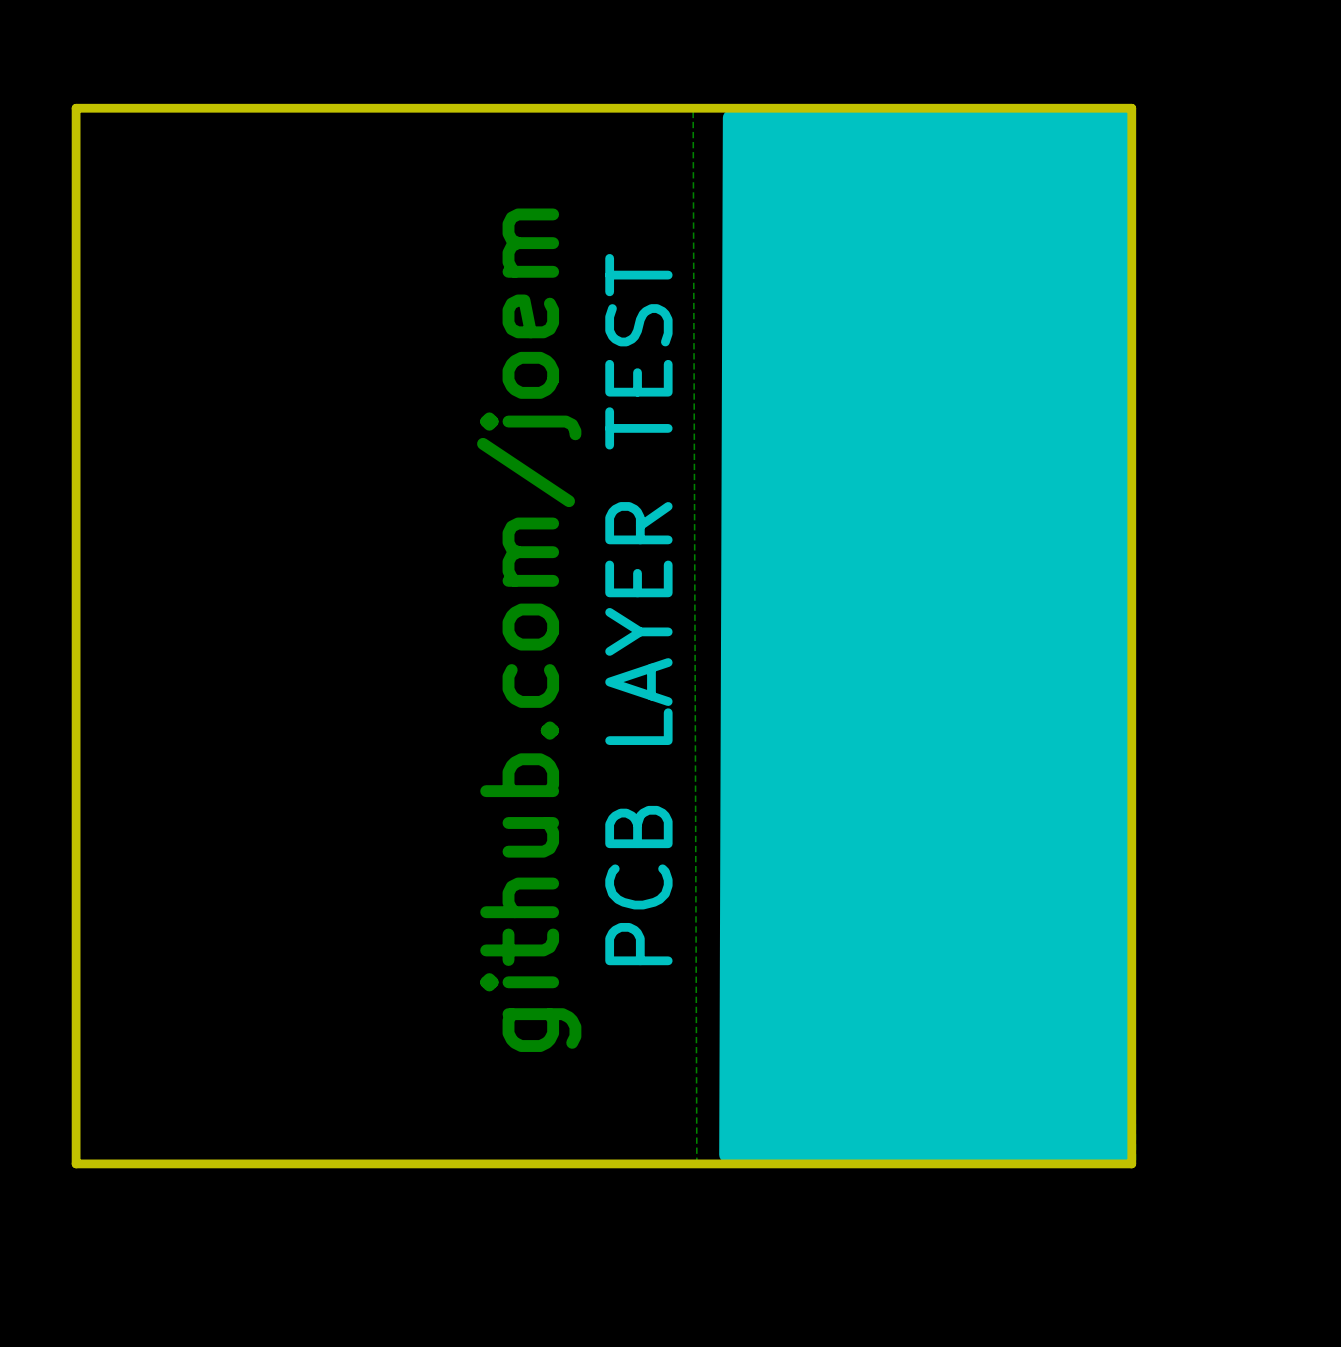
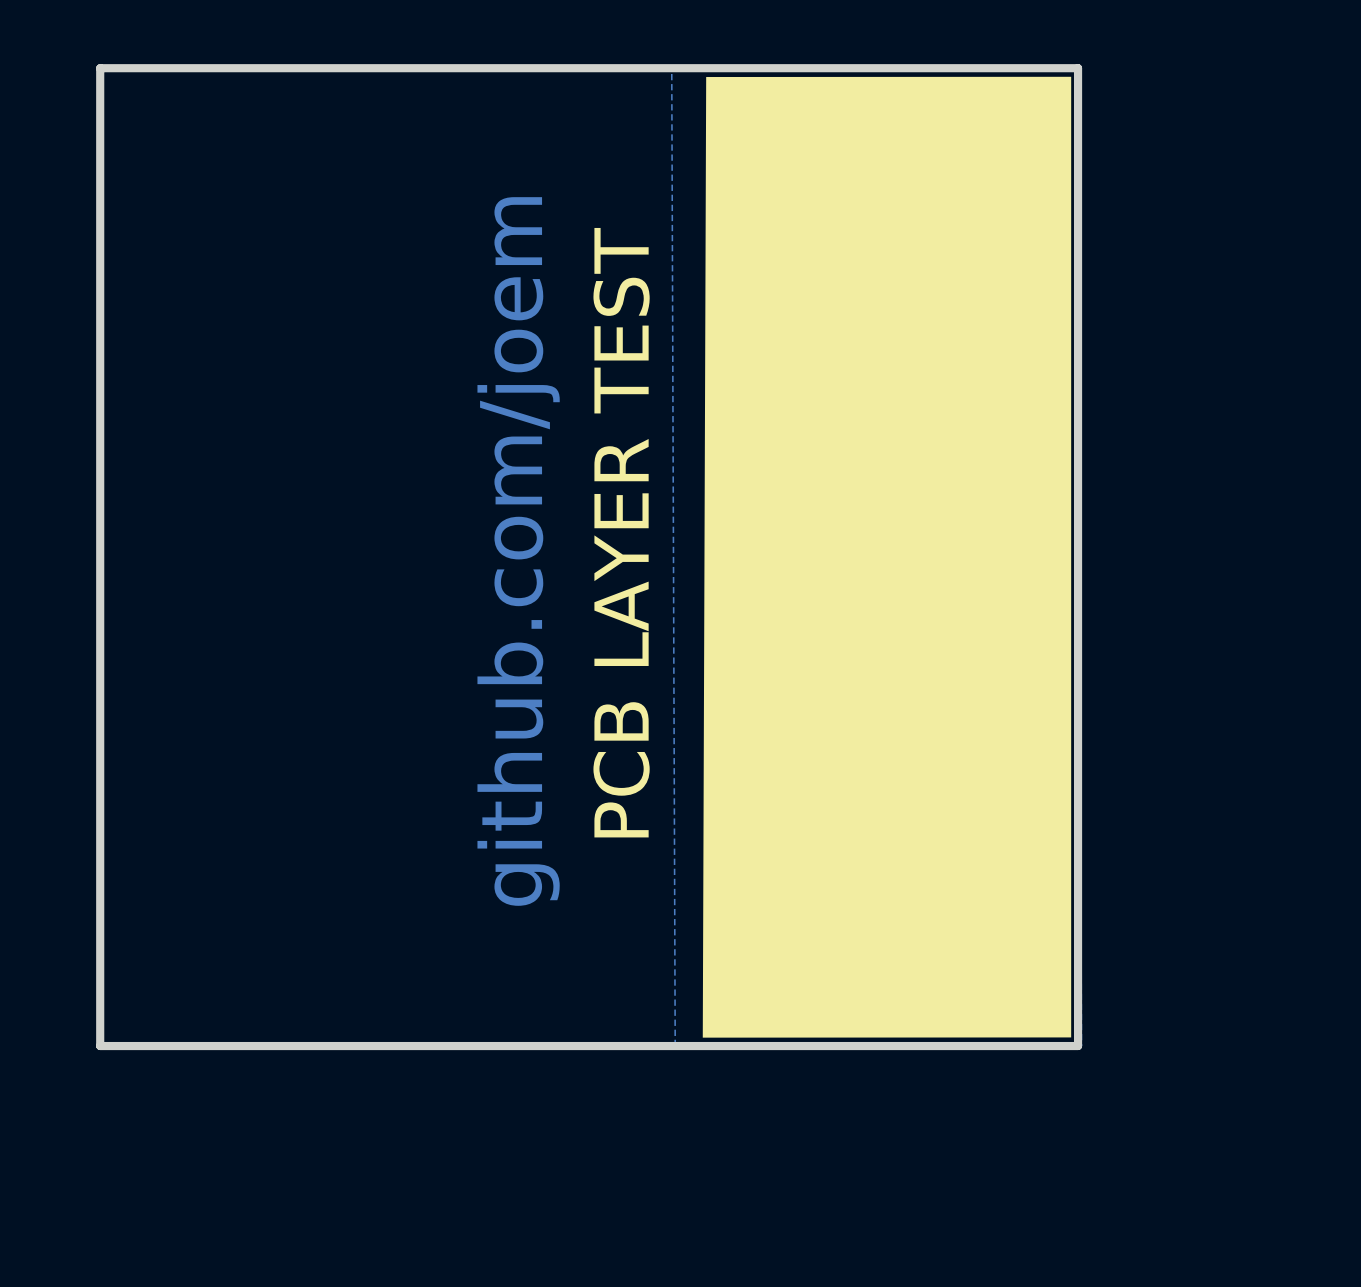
drawing shape: [719, 110, 1132, 1163] -> [702, 76, 1072, 1038]

